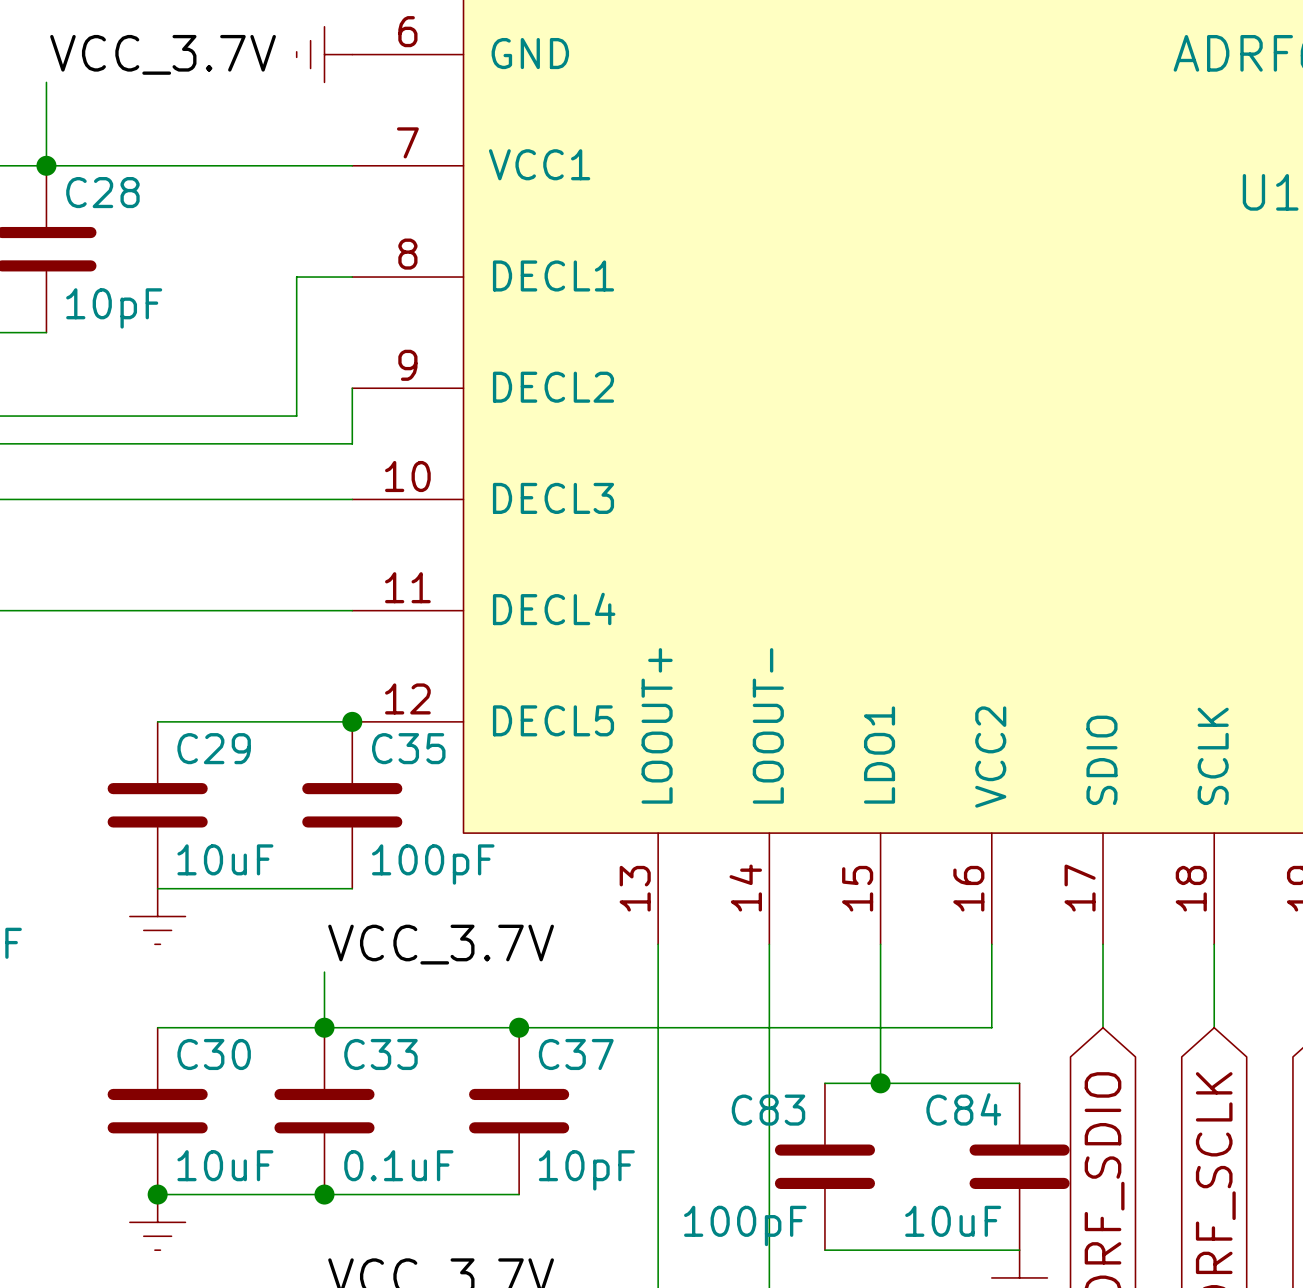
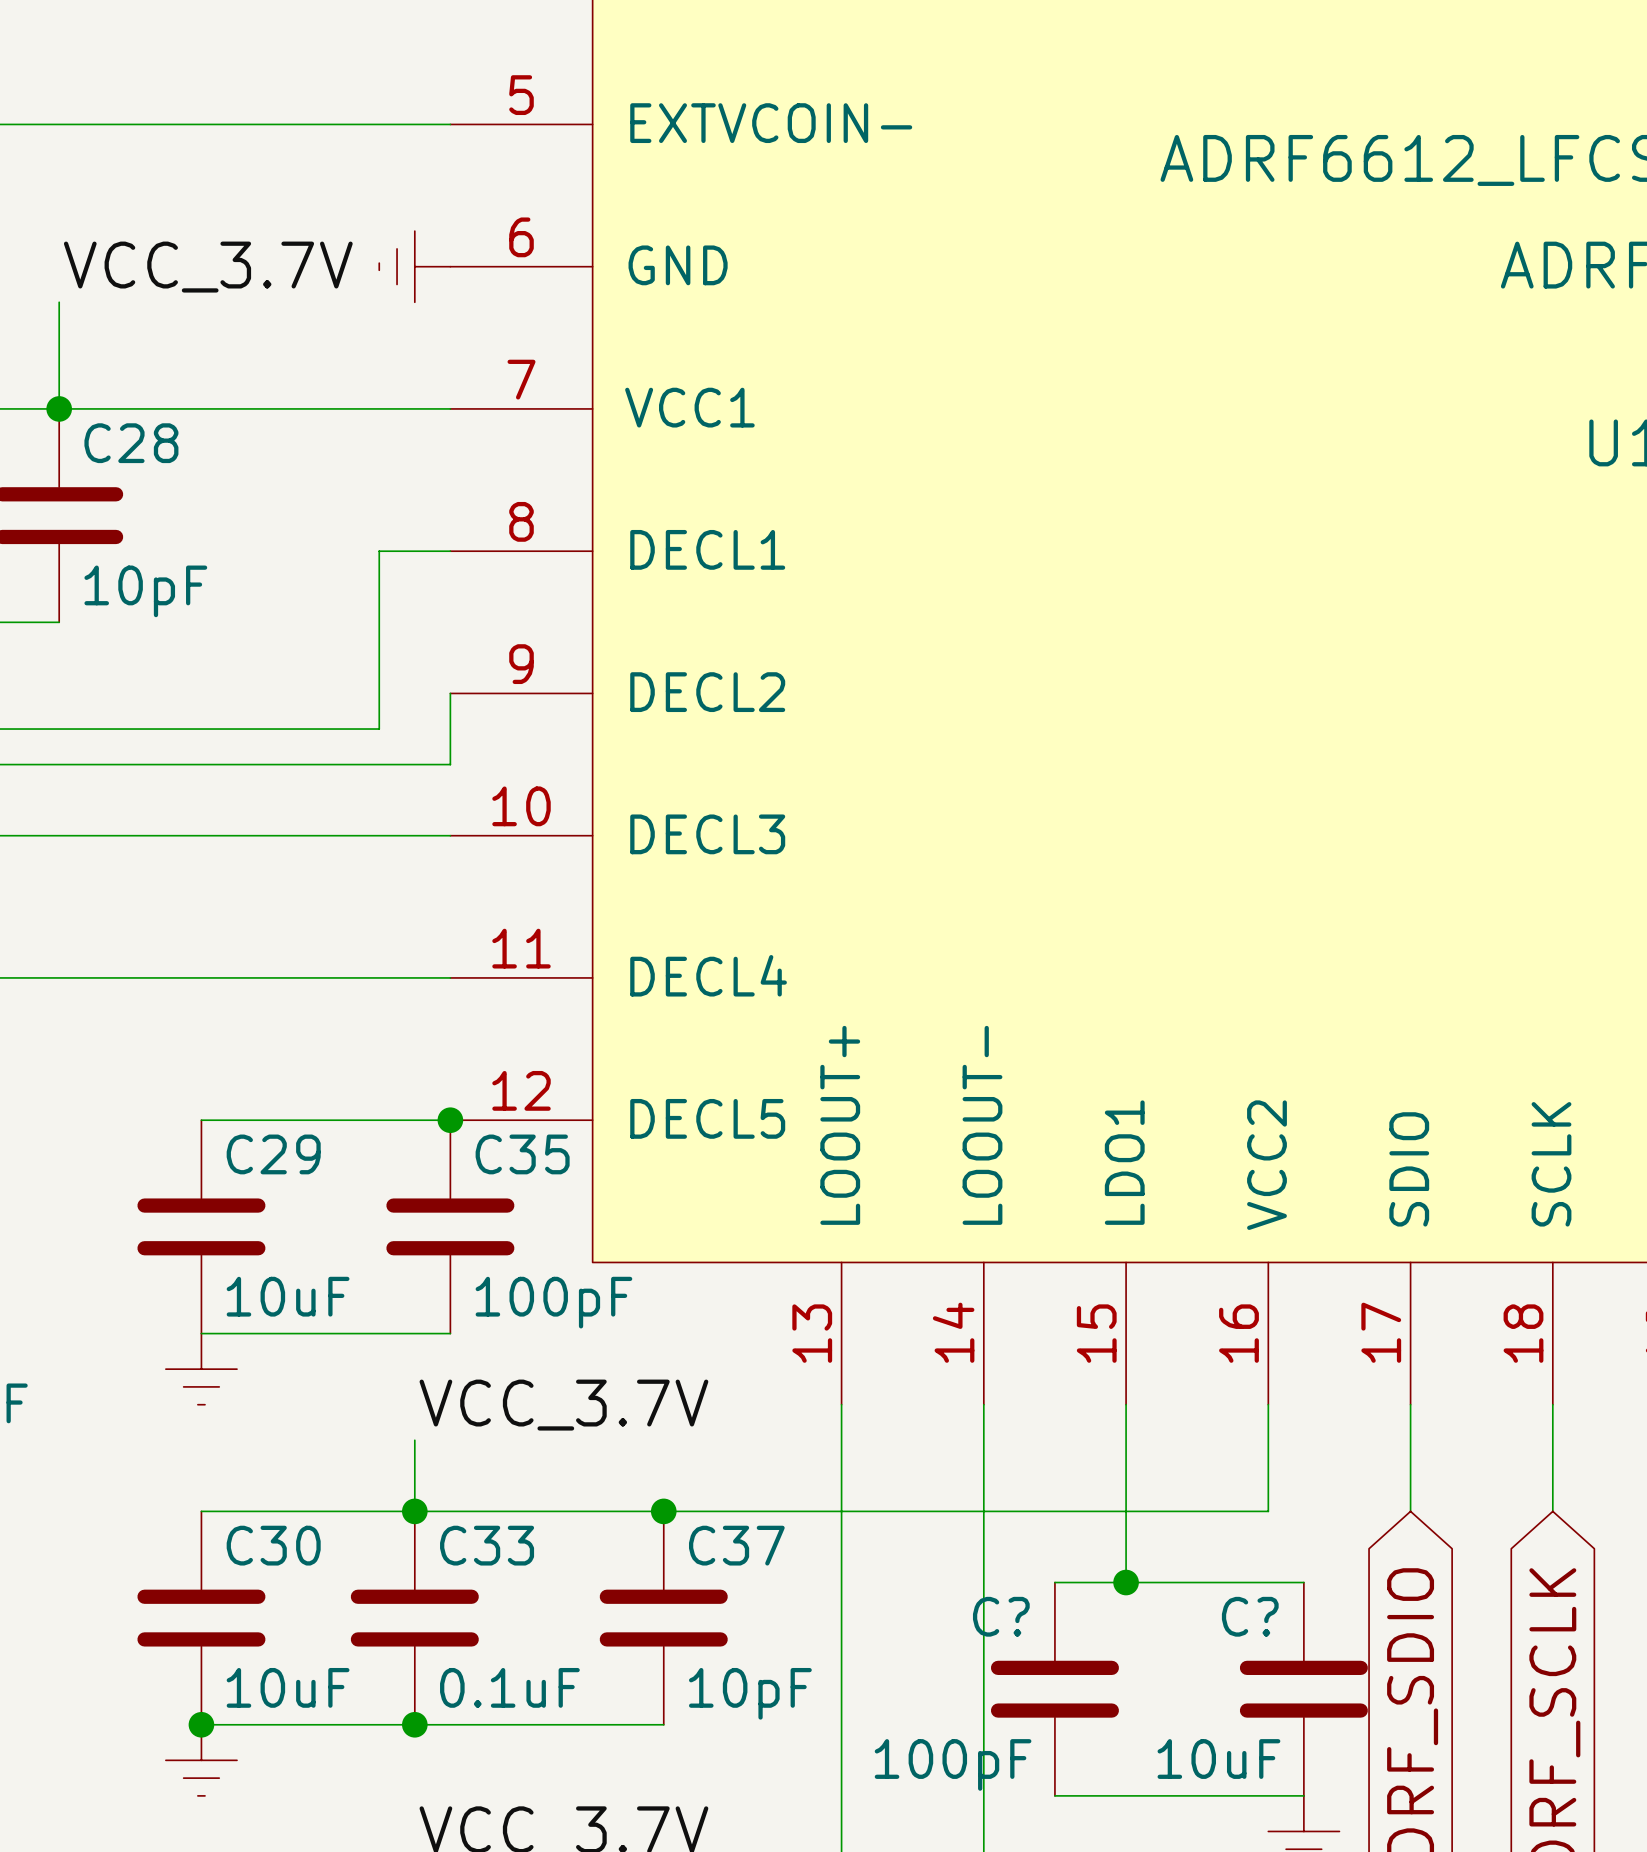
C84 name: C84 (963, 1109) -> C? (1250, 1616)
C83 name: C83 (768, 1110) -> C? (1001, 1616)

